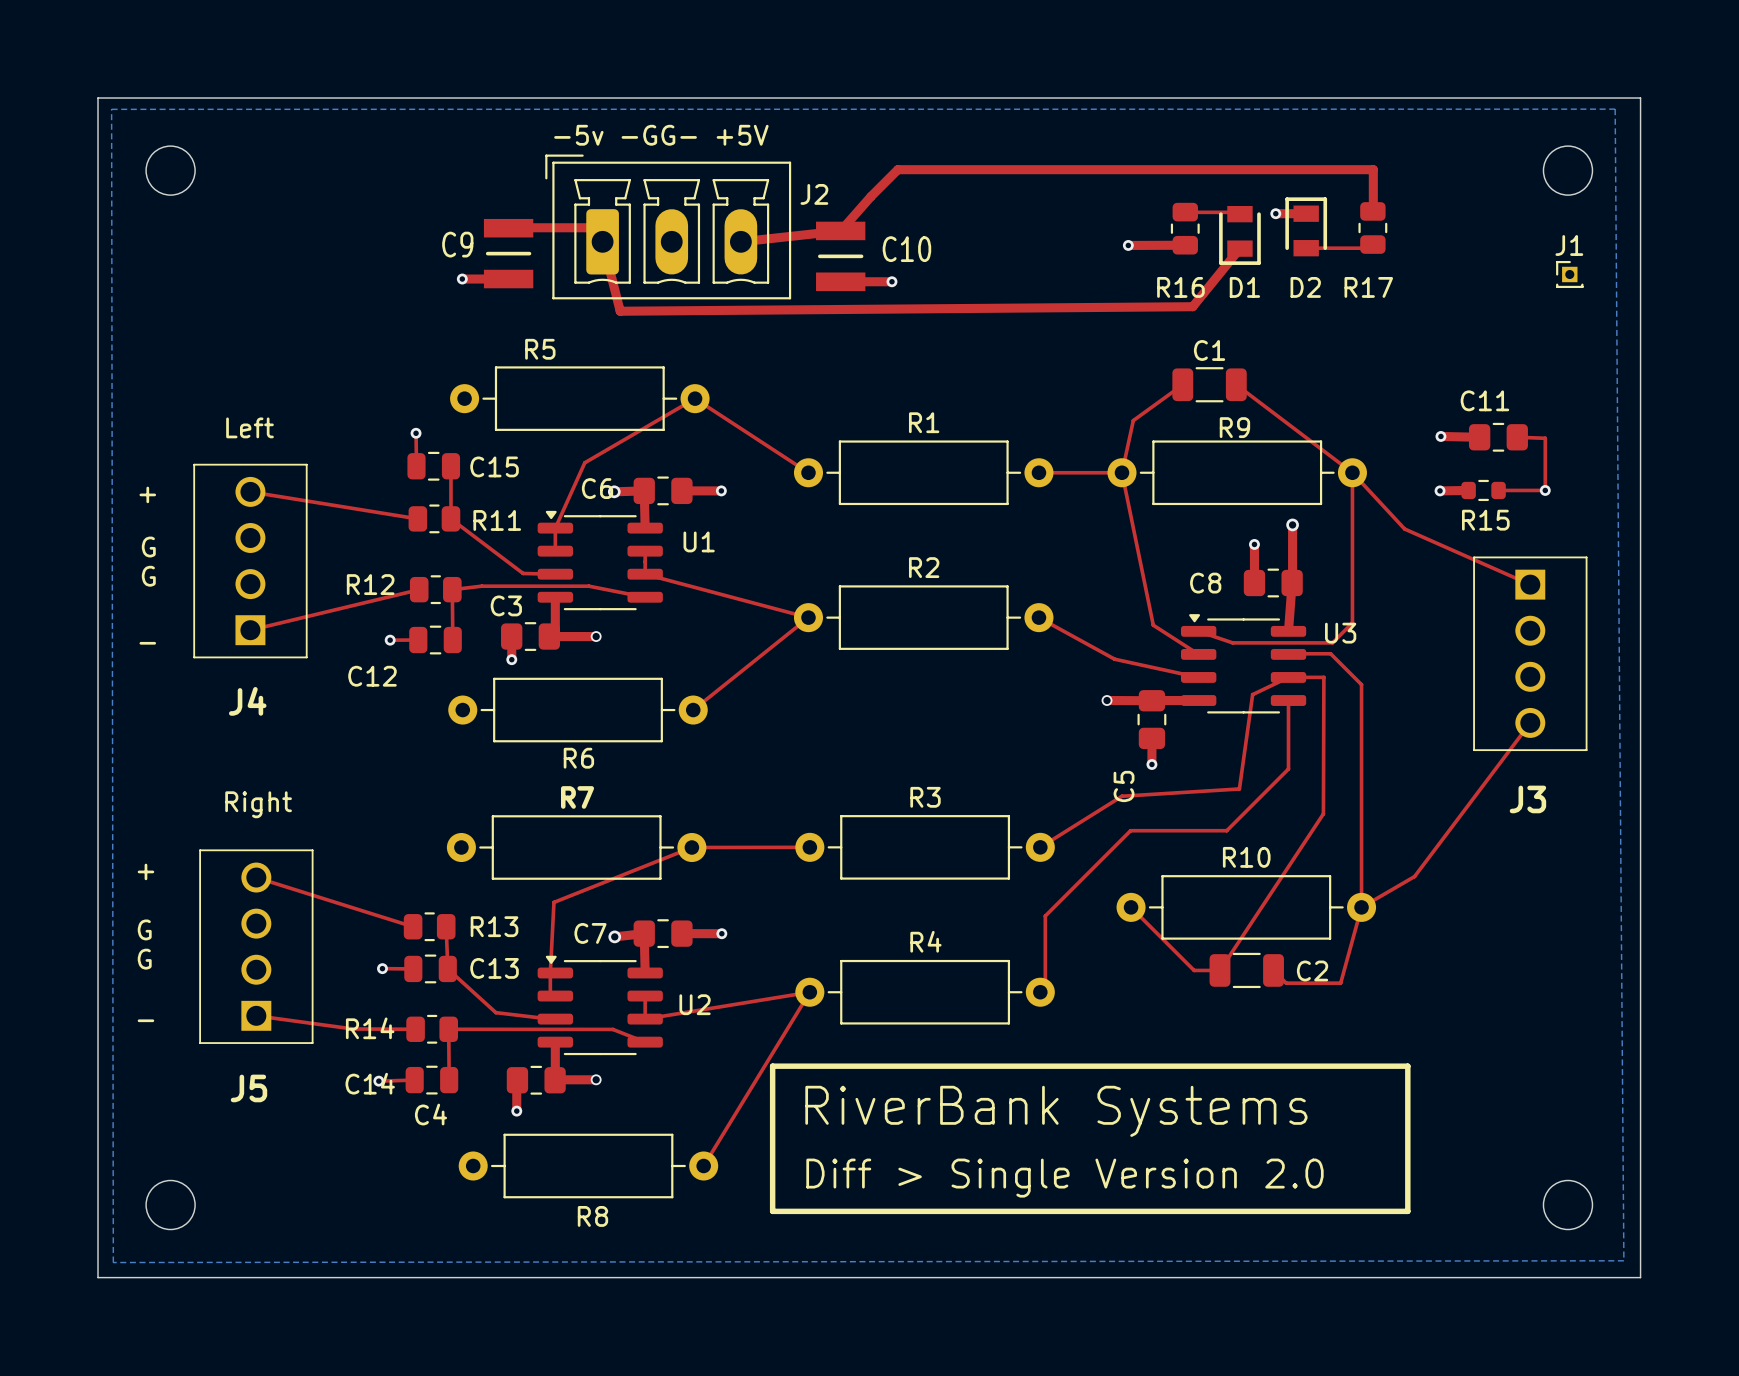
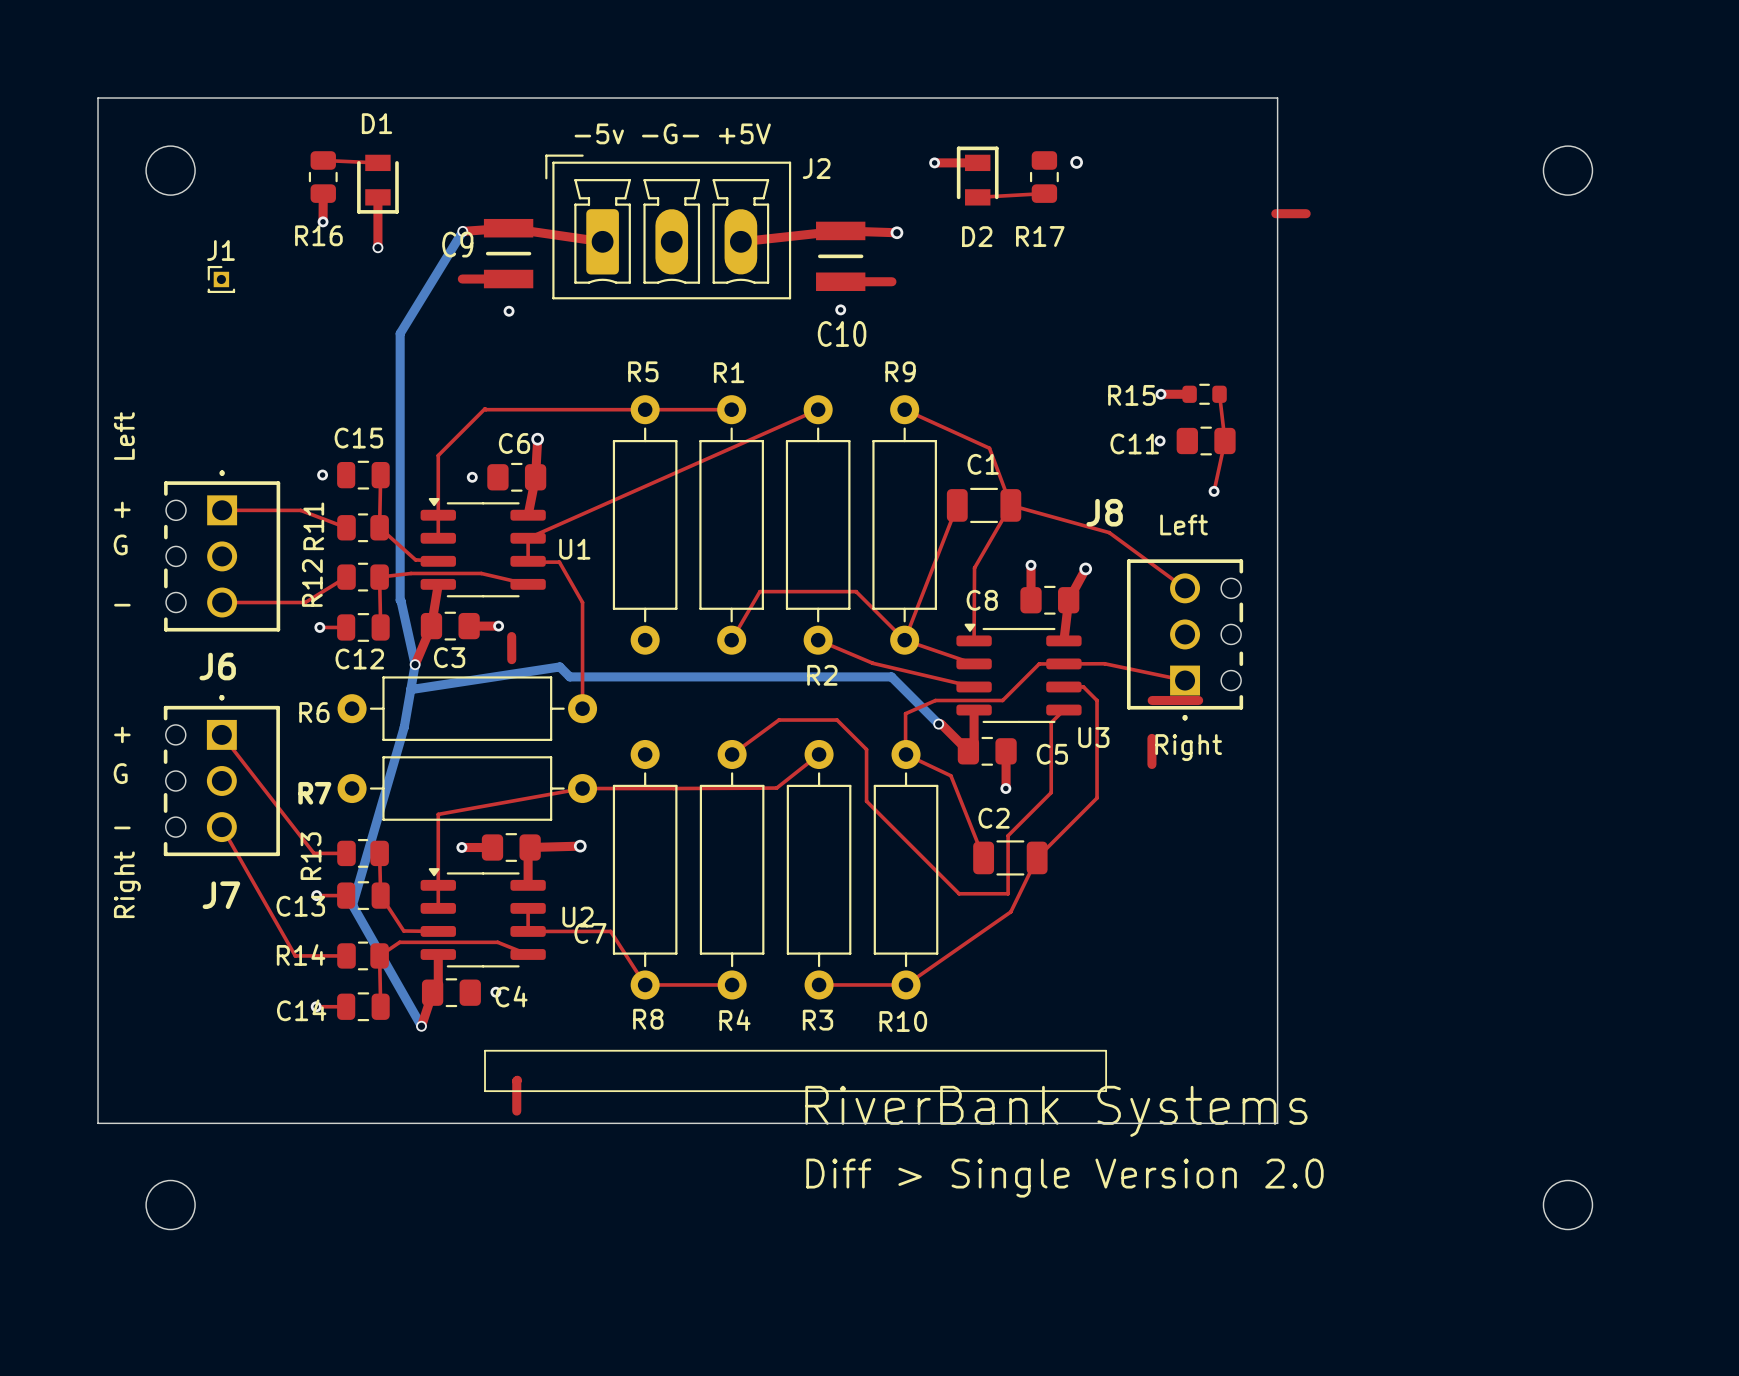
board edge: (1277, 98) (1640, 98) (1640, 1277) (98, 1277) (98, 1123) -> (1277, 98) (1277, 1123) (98, 1123)
bottom zone outline: (1615, 109) (111, 109) (113, 1262) (1623, 1260) (1615, 109) -> none
text: -5v -GG- +5V (661, 135) -> -5v -G- +5V (672, 133)
top track: none -> (323, 160) (377, 162)
top track: none -> (934, 162) (977, 162)
via: none -> (934, 162)
via: none -> (1076, 162)
top track: none -> (323, 193) (323, 221)
top track: none -> (1044, 193) (977, 197)
J2 name position: J2 (814, 194) -> J2 (816, 168)
top track: none -> (377, 197) (377, 247)
top track: (1372, 211) (1373, 169) (897, 169) (838, 233) -> none
top track: (1185, 212) (1238, 212) (1239, 214) -> none
via: (1275, 213) -> none
via: none -> (323, 221)
D2 position: (1306, 226) -> (977, 176)
R17 position: (1372, 227) -> (1044, 177)
top track: (508, 228) (588, 227) (602, 241) (620, 311) (1192, 306) (1239, 248) -> none
R16 position: (1185, 228) -> (323, 177)
top track: none -> (840, 230) (896, 232)
top track: none -> (462, 231) (508, 228) (602, 241)
bottom track: none -> (462, 231) (400, 333) (400, 600) (415, 664) (404, 727) (352, 905) (421, 1026)
via: none -> (462, 231)
via: none -> (896, 232)
D1 position: (1239, 235) -> (377, 184)
top track: (1372, 244) (1369, 248) (1306, 248) -> none
via: (1128, 245) -> none
top track: (1185, 245) (1128, 245) -> none
via: none -> (377, 247)
C10 name position: C10 (906, 249) -> C10 (842, 333)
J1 position: (1569, 274) -> (221, 279)
via position: (462, 279) -> (509, 311)
via position: (891, 281) -> (840, 309)
D1 name position: D1 (1244, 287) -> D1 (377, 123)
R5 name position: R5 (540, 349) -> R5 (643, 371)
C1 name position: C1 (1209, 350) -> C1 (983, 464)
top track: (1182, 384) (1133, 420) (1121, 472) -> none
C1 position: (1209, 384) -> (984, 505)
top track: (1236, 384) (1352, 472) -> none
top track: none -> (1161, 394) (1189, 394)
via: none -> (1161, 394)
top track: none -> (1219, 394) (1224, 441) (1214, 491)
R5 rotation: 0° (579, 398) -> 90° clockwise (645, 524)
C11 name position: C11 (1484, 400) -> C11 (1134, 443)
top track: none -> (731, 409) (485, 408) (438, 455) (438, 538)
top track: none -> (818, 409) (528, 538) (528, 561) (559, 562) (582, 602) (582, 708)
top track: none -> (904, 409) (989, 448) (1010, 505)
R1 name position: R1 (924, 422) -> R1 (729, 372)
text rotation: 0° (249, 427) -> 90° counterclockwise (124, 436)
text position: Left (249, 427) -> Left (124, 436)
R9 name position: R9 (1234, 427) -> R9 (900, 371)
top track: (416, 433) (416, 466) -> none
via: (416, 433) -> none
top track: (1440, 436) (1479, 437) -> none
via: (1440, 436) -> none
C11 position: (1498, 437) -> (1206, 441)
top track: (1517, 437) (1545, 438) (1545, 490) (1498, 490) -> none
top track: none -> (537, 439) (535, 477) (528, 515)
via: none -> (1160, 441)
C15 position: (433, 466) -> (363, 475)
top track: (450, 466) (450, 518) (523, 573) (555, 574) -> none
C15 name position: C15 (494, 466) -> C15 (358, 438)
top track: (808, 472) (695, 398) (584, 462) (555, 528) (555, 551) -> none
R1 rotation: 0° (923, 472) -> 90° clockwise (731, 524)
R1 position: (923, 472) -> (731, 524)
top track: (1038, 472) (1121, 472) -> none
top track: (1121, 472) (1153, 625) (1198, 654) -> none
R9 rotation: 0° (1237, 472) -> 90° clockwise (904, 524)
R9 position: (1237, 472) -> (904, 524)
top track: (1352, 472) (1352, 622) (1332, 642) (1232, 642) (1198, 631) -> none
top track: (1352, 472) (1404, 529) (1530, 584) -> none
via: none -> (322, 475)
top track: none -> (380, 475) (379, 527) (415, 559) (438, 561)
via: none -> (472, 477)
C6 name position: C6 (597, 488) -> C6 (514, 443)
C6 position: (663, 490) -> (516, 477)
top track: (681, 490) (721, 490) -> none
via: (721, 490) -> none
via: (1440, 490) -> none
top track: (1468, 490) (1440, 490) -> none
R15 position: (1483, 490) -> (1204, 394)
via: (1545, 490) -> none
top track: (250, 491) (417, 518) -> none
top track: (614, 491) (644, 490) (645, 528) -> none
via position: (614, 491) -> (537, 439)
text position: + (147, 494) -> + (122, 509)
top track: none -> (957, 505) (904, 640)
top track: none -> (1010, 505) (1109, 532) (1185, 588)
top track: none -> (1010, 505) (974, 568) (974, 640)
top track: none -> (222, 510) (300, 510) (346, 527)
R11 position: (434, 518) -> (363, 527)
R11 name rotation: 0° (497, 520) -> 90° counterclockwise (313, 526)
R11 name position: R11 (497, 520) -> R11 (313, 526)
R15 name position: R15 (1485, 520) -> R15 (1131, 395)
text: none -> Left (1184, 524)
top track: (1292, 524) (1292, 582) (1288, 631) -> none
via: (1292, 524) -> none
U1 name position: U1 (699, 541) -> U1 (574, 549)
text: none -> G (120, 544)
top track: (1254, 544) (1254, 583) -> none
via position: (1254, 544) -> (1214, 491)
text: G (148, 547) -> none
J6: none -> (222, 550)
top track: (645, 551) (645, 574) (808, 617) (693, 710) -> none
U1 position: (600, 560) -> (483, 547)
J4: (250, 561) -> none
top track: none -> (1031, 565) (1031, 600)
via: none -> (1031, 565)
R2 name position: R2 (924, 567) -> R2 (822, 675)
top track: none -> (1085, 568) (1068, 600) (1063, 640)
via: none -> (1085, 568)
text: G (148, 576) -> none
top track: none -> (346, 577) (305, 602) (222, 602)
C8 position: (1273, 583) -> (1049, 600)
R12 name rotation: 0° (370, 584) -> 90° counterclockwise (312, 583)
top track: none -> (438, 584) (431, 626) (415, 664)
top track: none -> (528, 584) (481, 573) (411, 573) (379, 577) (380, 627)
top track: (419, 589) (250, 630) -> none
R12 position: (435, 589) -> (363, 577)
top track: (555, 597) (555, 630) (549, 636) (596, 636) -> none
top track: (645, 597) (588, 586) (481, 586) (452, 589) (452, 640) -> none
C3 name position: C3 (506, 605) -> C3 (449, 657)
R2 rotation: 0° (923, 617) -> 90° clockwise (818, 524)
top track: (1038, 617) (1114, 659) (1198, 677) -> none
top track: none -> (469, 626) (498, 626)
top track: none -> (319, 627) (346, 627)
via: none -> (319, 627)
U3 name position: U3 (1340, 633) -> U3 (1093, 737)
C3 position: (530, 636) -> (450, 626)
via: (596, 636) -> none
J8: none -> (1185, 639)
via: (390, 640) -> none
top track: (418, 640) (390, 640) -> none
C12 position: (435, 640) -> (363, 627)
top track: none -> (731, 640) (759, 591) (856, 591) (904, 640)
top track: none -> (818, 640) (872, 663) (974, 686)
top track: none -> (904, 640) (974, 663)
text position: - (147, 643) -> - (122, 605)
J3: (1530, 653) -> none
top track: (1288, 654) (1330, 653) (1361, 684) (1361, 907) -> none
via position: (511, 659) -> (498, 626)
U3 position: (1243, 663) -> (1019, 673)
via: none -> (415, 664)
C12 name position: C12 (372, 676) -> C12 (359, 659)
top track: (1288, 677) (1323, 677) (1323, 813) (1219, 970) (1194, 970) (1131, 907) (1131, 911) -> none
top track: (1288, 677) (1252, 694) (1239, 788) (1121, 796) (1040, 847) (1040, 851) -> none
top track: none -> (1185, 680) (1104, 663) (1039, 663) (1002, 700) (935, 700) (905, 713) (905, 754) (950, 775) (983, 857)
top track: none -> (1063, 686) (1083, 686) (1097, 700) (1097, 798) (1037, 857) (1010, 911) (906, 984) (819, 984)
bottom track: none -> (410, 689) (559, 666) (569, 676) (891, 676) (938, 724)
top track: (1107, 700) (1151, 700) -> none
via: (1107, 700) -> none
top track: (1288, 700) (1288, 769) (1226, 830) (1130, 830) (1045, 916) (1045, 987) (1040, 992) -> none
R6 position: (578, 710) -> (467, 708)
top track: none -> (974, 710) (974, 745) (968, 751) (941, 724) (938, 724)
top track: none -> (1063, 710) (1051, 722) (1051, 792) (1008, 835) (1008, 893) (959, 893) (866, 801) (866, 749) (837, 720) (779, 720) (732, 754)
C5 rotation: 0° (1151, 719) -> 90° clockwise (987, 751)
C5 position: (1151, 719) -> (987, 751)
top track: (1530, 722) (1414, 876) (1361, 907) -> none
via: none -> (938, 724)
text: none -> + (122, 734)
top track: none -> (221, 734) (313, 853) (346, 853)
text: none -> Right (1188, 747)
top track: none -> (1006, 751) (1006, 788)
top track: none -> (819, 754) (776, 788) (582, 788) (438, 814) (438, 908)
R6 name position: R6 (578, 758) -> R6 (314, 712)
via: (1151, 764) -> none
text: none -> G (120, 773)
J7: none -> (221, 775)
C5 name position: C5 (1124, 786) -> C5 (1052, 754)
via: none -> (1005, 788)
R7 name position: R7 (577, 797) -> R7 (314, 793)
R3 name position: R3 (925, 797) -> R3 (817, 1020)
text rotation: 0° (258, 804) -> 90° counterclockwise (127, 884)
text position: Right (258, 804) -> Right (127, 884)
text: none -> - (122, 827)
top track: none -> (221, 827) (295, 955) (346, 955)
top track: none -> (580, 846) (530, 847) (528, 849) (528, 885)
via: none -> (461, 847)
R7 position: (576, 847) -> (467, 788)
top track: (809, 847) (691, 847) (553, 902) (550, 996) -> none
R3 rotation: 0° (925, 847) -> 90° clockwise (819, 869)
top track: none -> (379, 853) (380, 895) (403, 930) (438, 931)
R10 name position: R10 (1246, 857) -> R10 (903, 1021)
text: + (145, 871) -> none
top track: (256, 877) (413, 926) -> none
top track: none -> (316, 895) (346, 895)
via: none -> (316, 895)
R10 rotation: 0° (1246, 907) -> 90° clockwise (906, 869)
R10 position: (1246, 907) -> (906, 869)
top track: (1361, 907) (1340, 983) (1286, 983) (1273, 970) -> none
top track: none -> (528, 908) (528, 931) (610, 931) (645, 984) (732, 984)
R13 position: (429, 926) -> (363, 853)
top track: (446, 926) (447, 968) (495, 1012) (550, 1019) -> none
R13 name rotation: 0° (494, 926) -> 90° counterclockwise (311, 856)
R13 name position: R13 (494, 926) -> R13 (311, 856)
text: G (144, 929) -> none
C7 position: (663, 933) -> (511, 847)
top track: (681, 933) (721, 933) -> none
via: (721, 933) -> none
top track: (614, 936) (644, 933) (645, 972) -> none
via position: (614, 936) -> (580, 846)
R4 name position: R4 (925, 941) -> R4 (734, 1020)
J5: (256, 946) -> none
top track: none -> (438, 954) (438, 987) (432, 992) (421, 1026)
top track: none -> (528, 954) (497, 942) (399, 942) (379, 955) (380, 1006)
text: G (144, 959) -> none
top track: (382, 968) (413, 968) -> (461, 847) (492, 847)
via: (382, 968) -> none
C13 position: (430, 968) -> (363, 895)
C13 name position: C13 (494, 968) -> C13 (300, 906)
C2 position: (1246, 970) -> (1010, 857)
C2 name position: C2 (1312, 970) -> C2 (994, 818)
via: none -> (495, 992)
R4 rotation: 0° (925, 992) -> 90° clockwise (732, 869)
R4 position: (925, 992) -> (732, 869)
top track: (645, 996) (645, 1019) (809, 992) (703, 1165) -> none
U2 position: (600, 1005) -> (483, 917)
top track: none -> (316, 1006) (346, 1006)
via: none -> (316, 1006)
top track: (256, 1015) (352, 1028) (415, 1029) -> none
text: - (145, 1020) -> none
via: none -> (421, 1026)
R14 position: (432, 1029) -> (363, 955)
top track: (555, 1042) (555, 1080) -> none
top track: (645, 1042) (612, 1029) (448, 1029) (449, 1080) -> none
line: none -> (485, 1050) (1106, 1050) (1106, 1091) (485, 1091) (485, 1050)
line: (772, 1066) (1407, 1066) (1407, 1211) (772, 1211) (772, 1066) -> none
top track: (596, 1079) (555, 1080) -> none
via: (596, 1079) -> none
top track: (414, 1080) (378, 1081) -> none
C14 position: (431, 1080) -> (363, 1006)
C4 position: (536, 1080) -> (451, 992)
via: (378, 1081) -> none
via: (516, 1111) -> none
C4 name position: C4 (430, 1114) -> C4 (511, 996)
R8 rotation: 0° (588, 1165) -> 90° clockwise (645, 869)
R8 position: (588, 1165) -> (645, 869)
R8 name position: R8 (592, 1216) -> R8 (648, 1019)

